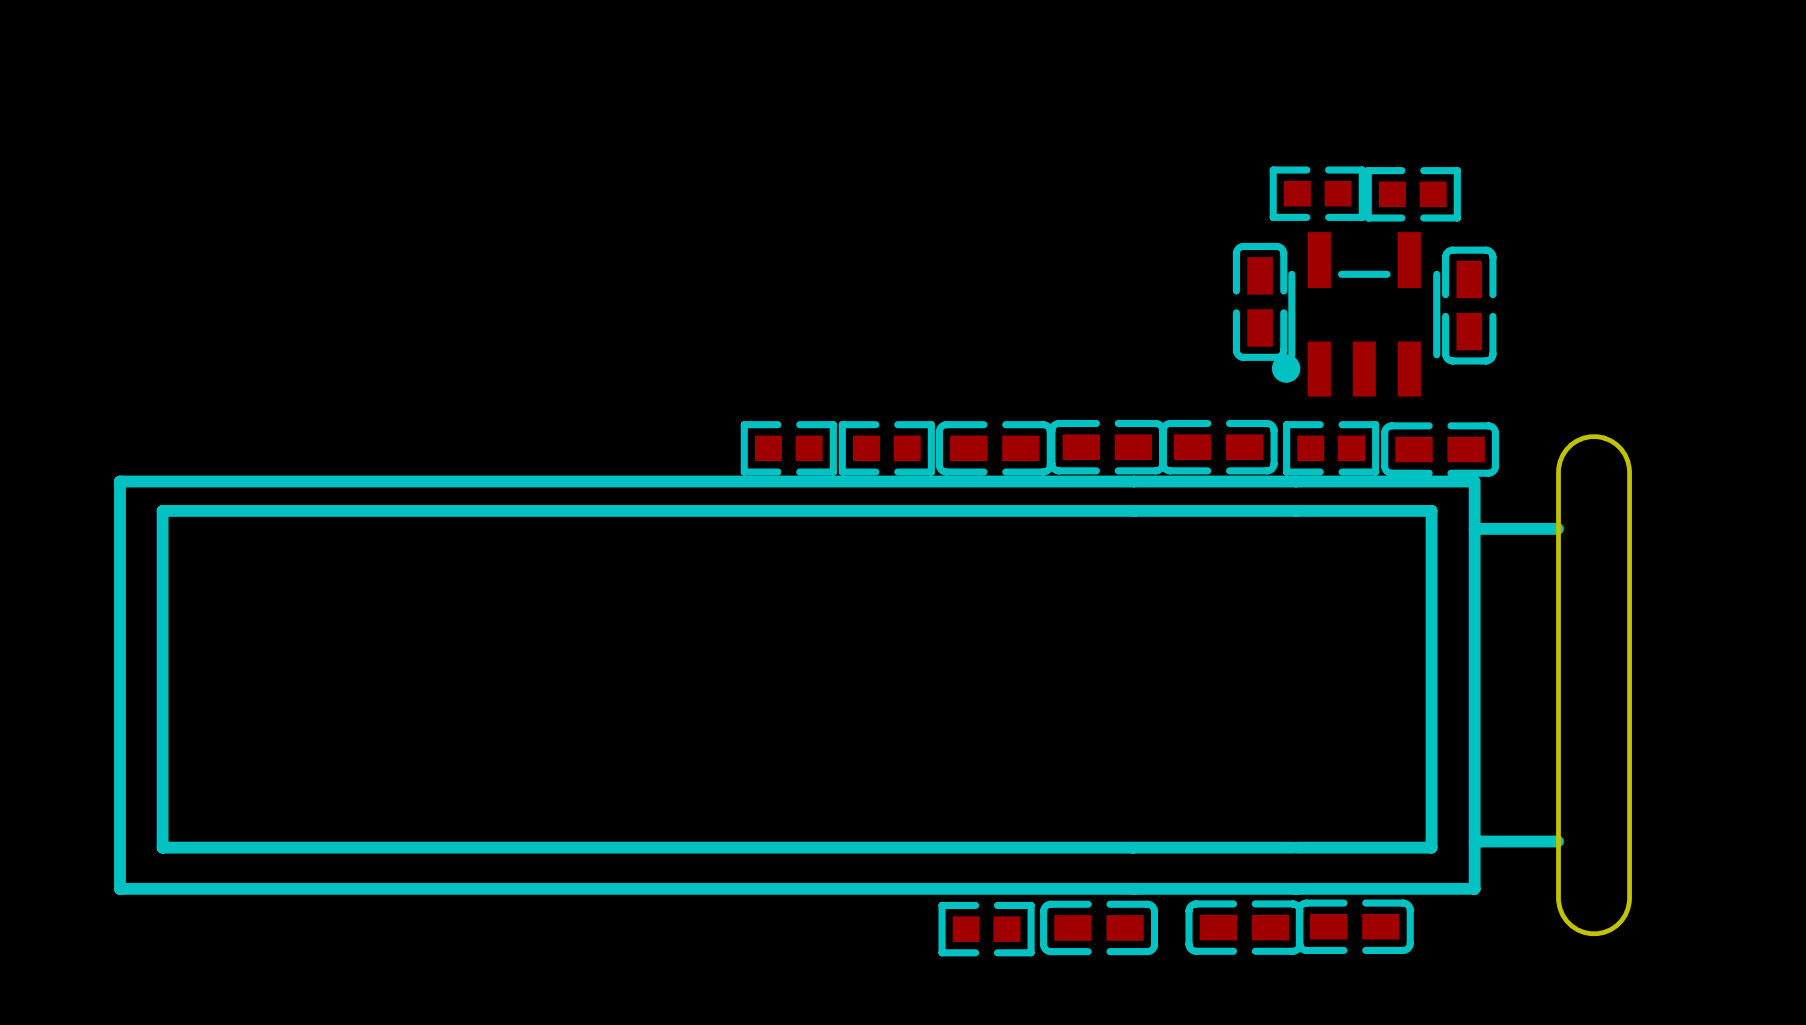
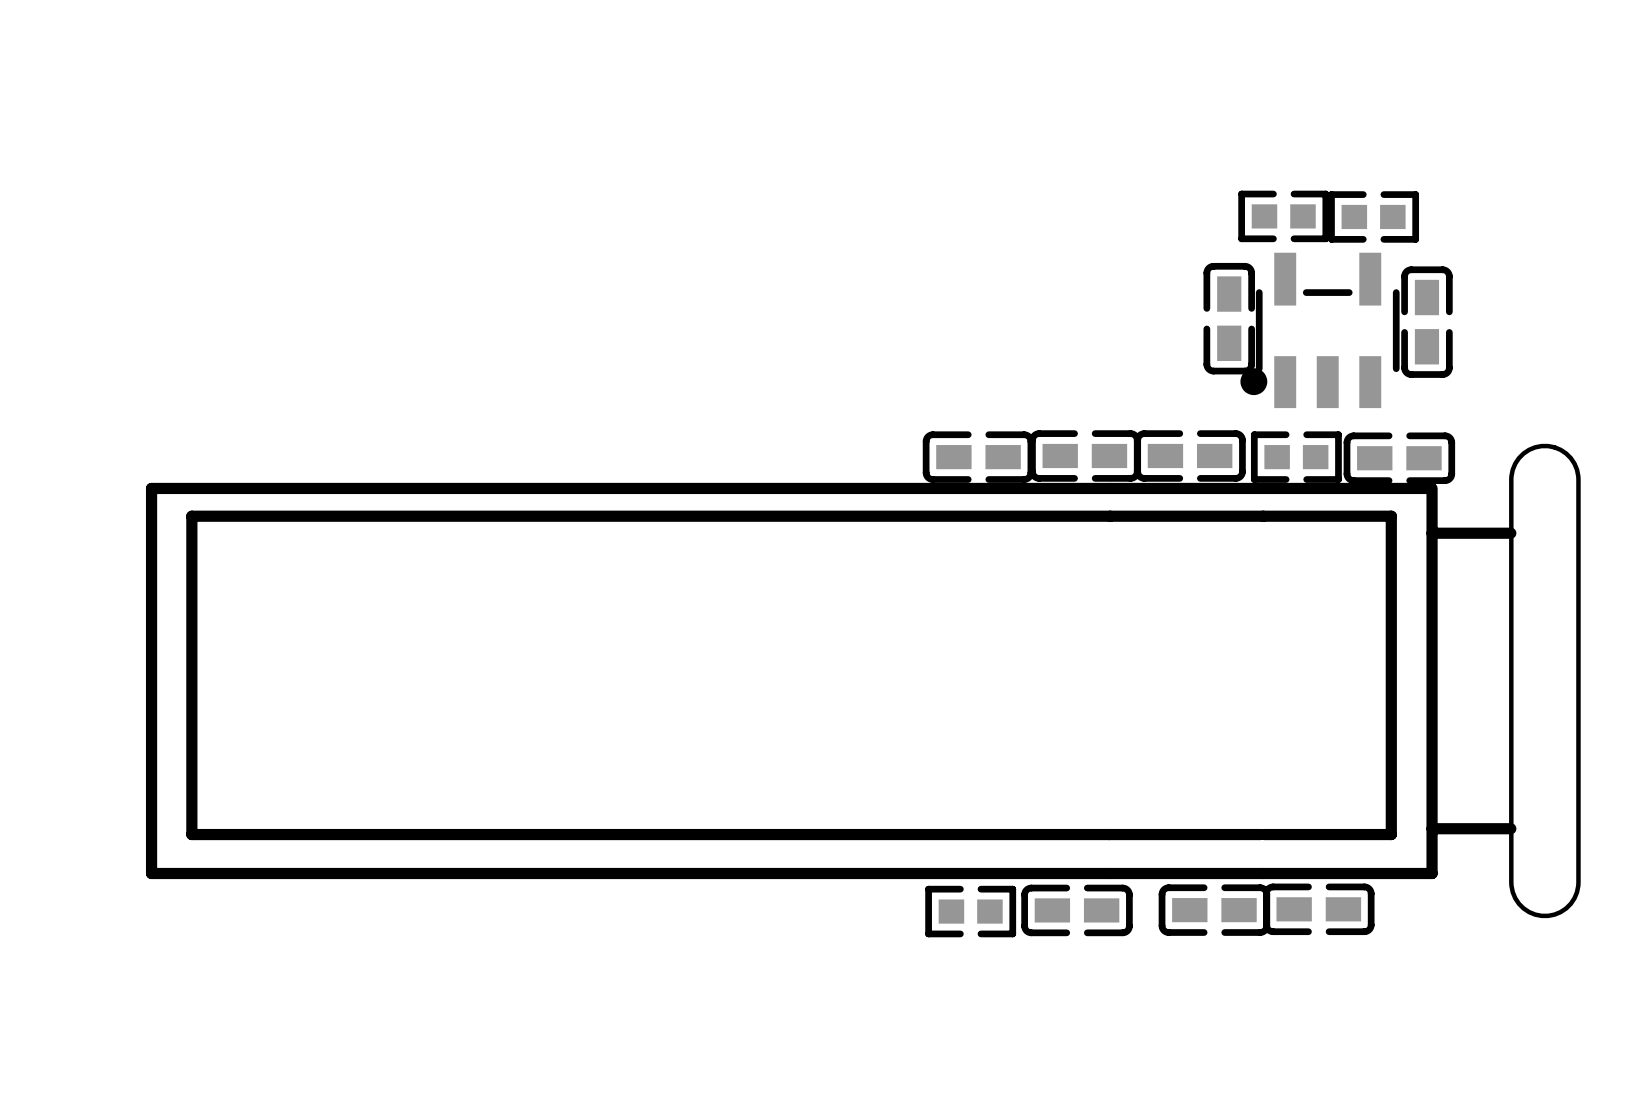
part: (788, 448) -> none
part: (886, 448) -> none

